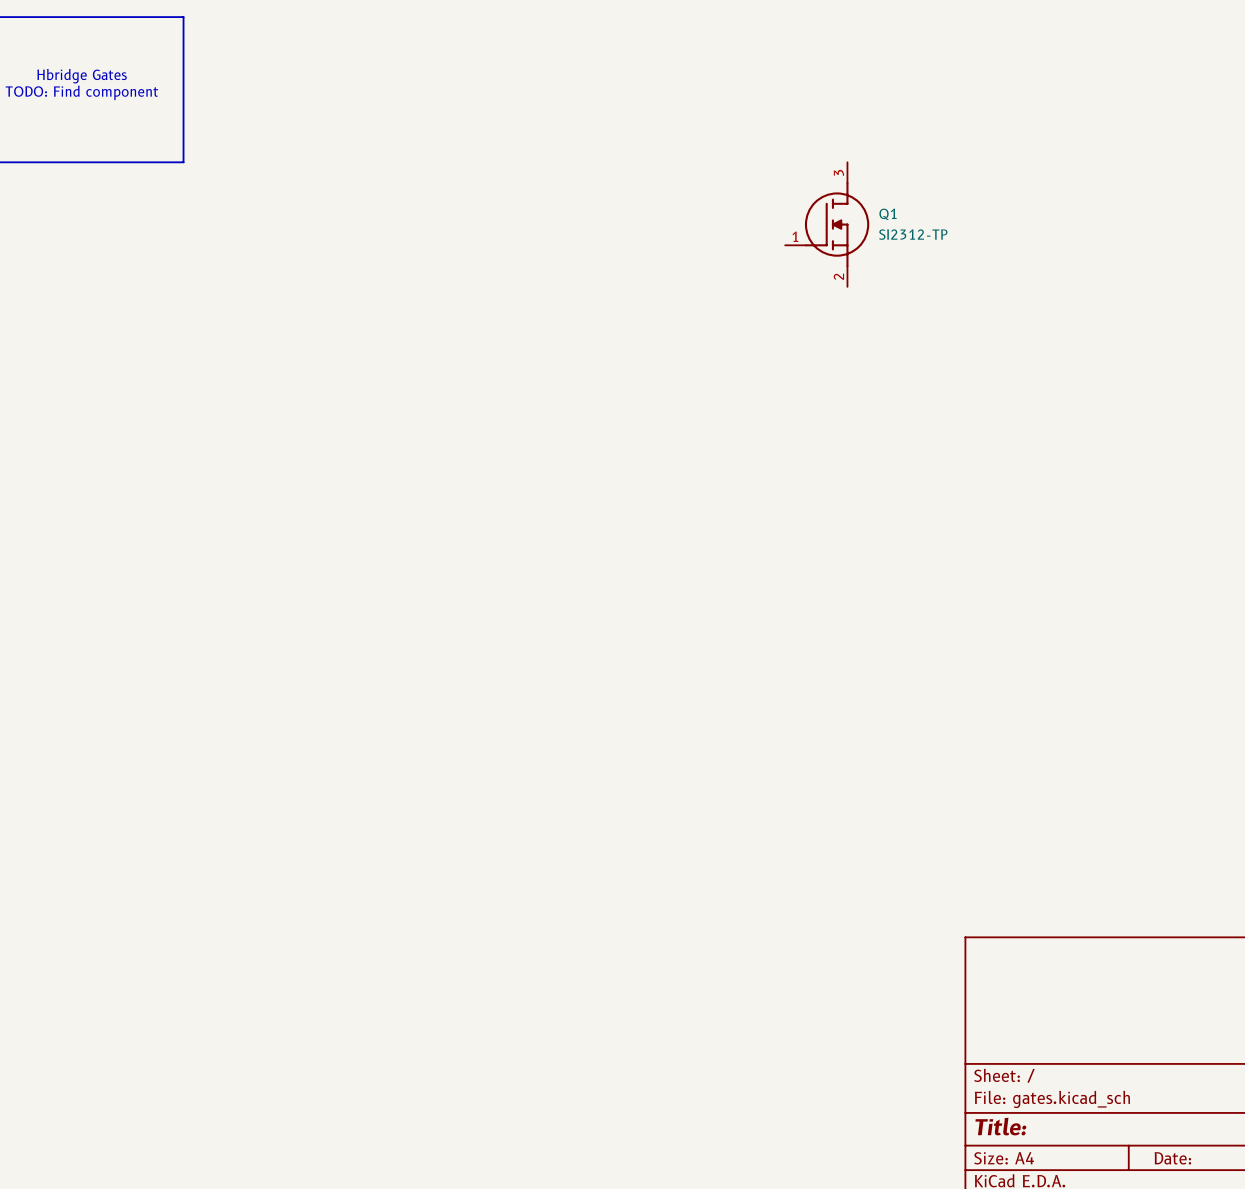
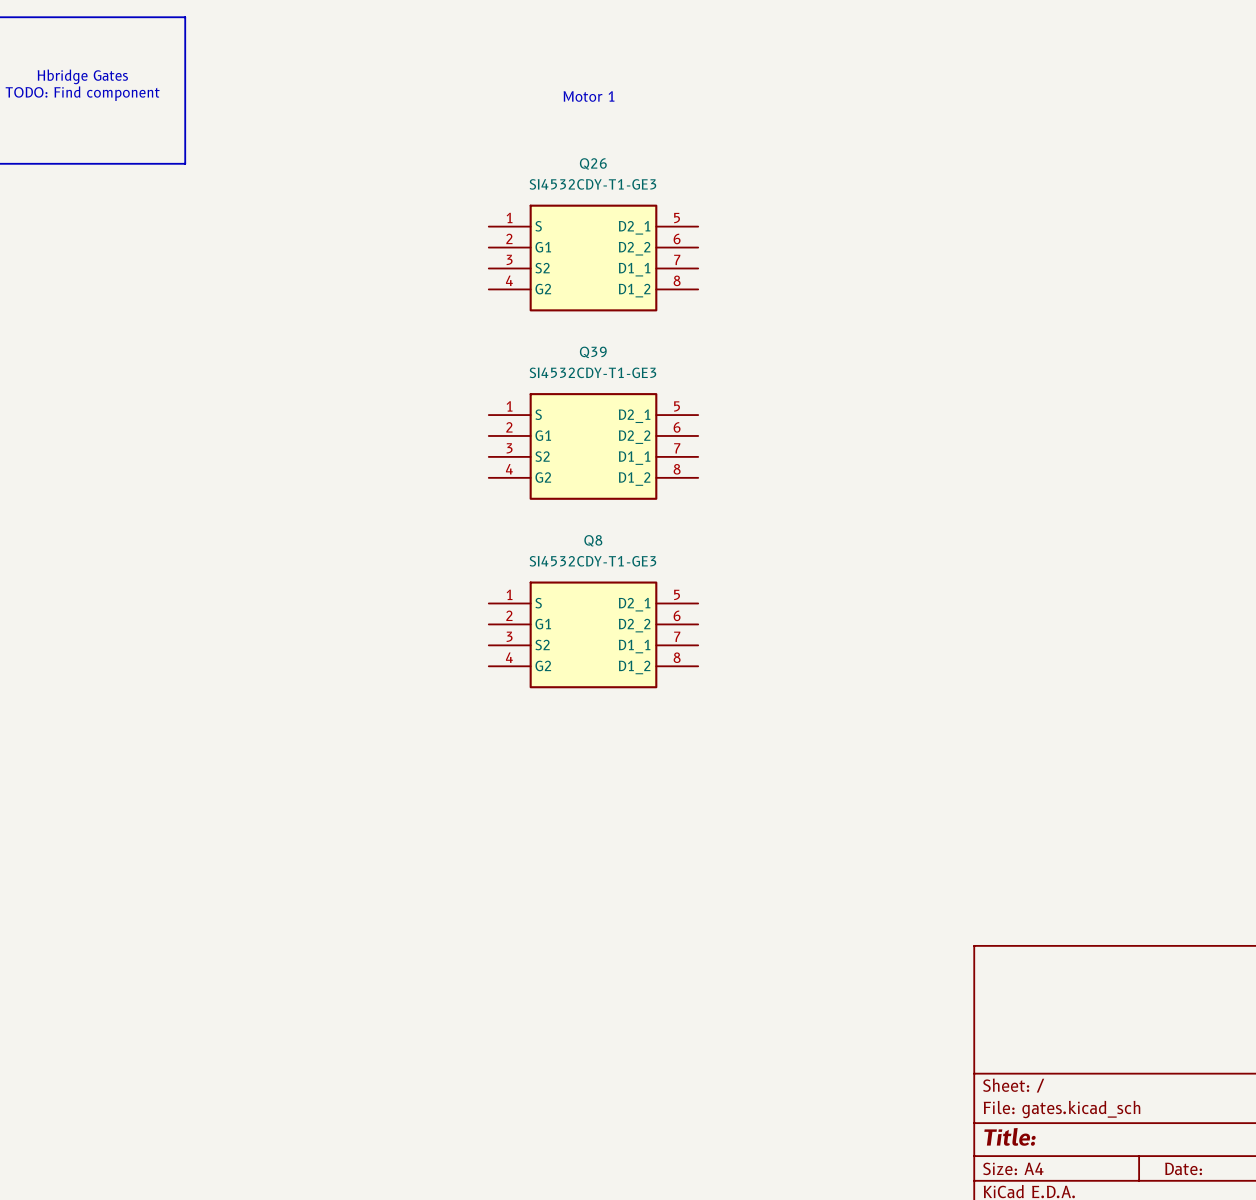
text: none -> Motor 1 (589, 96)
Q1: SI2312-TP (827, 224) -> none
Q26: none -> SI4532CDY-T1-GE3 (593, 258)
Q39: none -> SI4532CDY-T1-GE3 (593, 446)
Q8: none -> SI4532CDY-T1-GE3 (593, 634)

